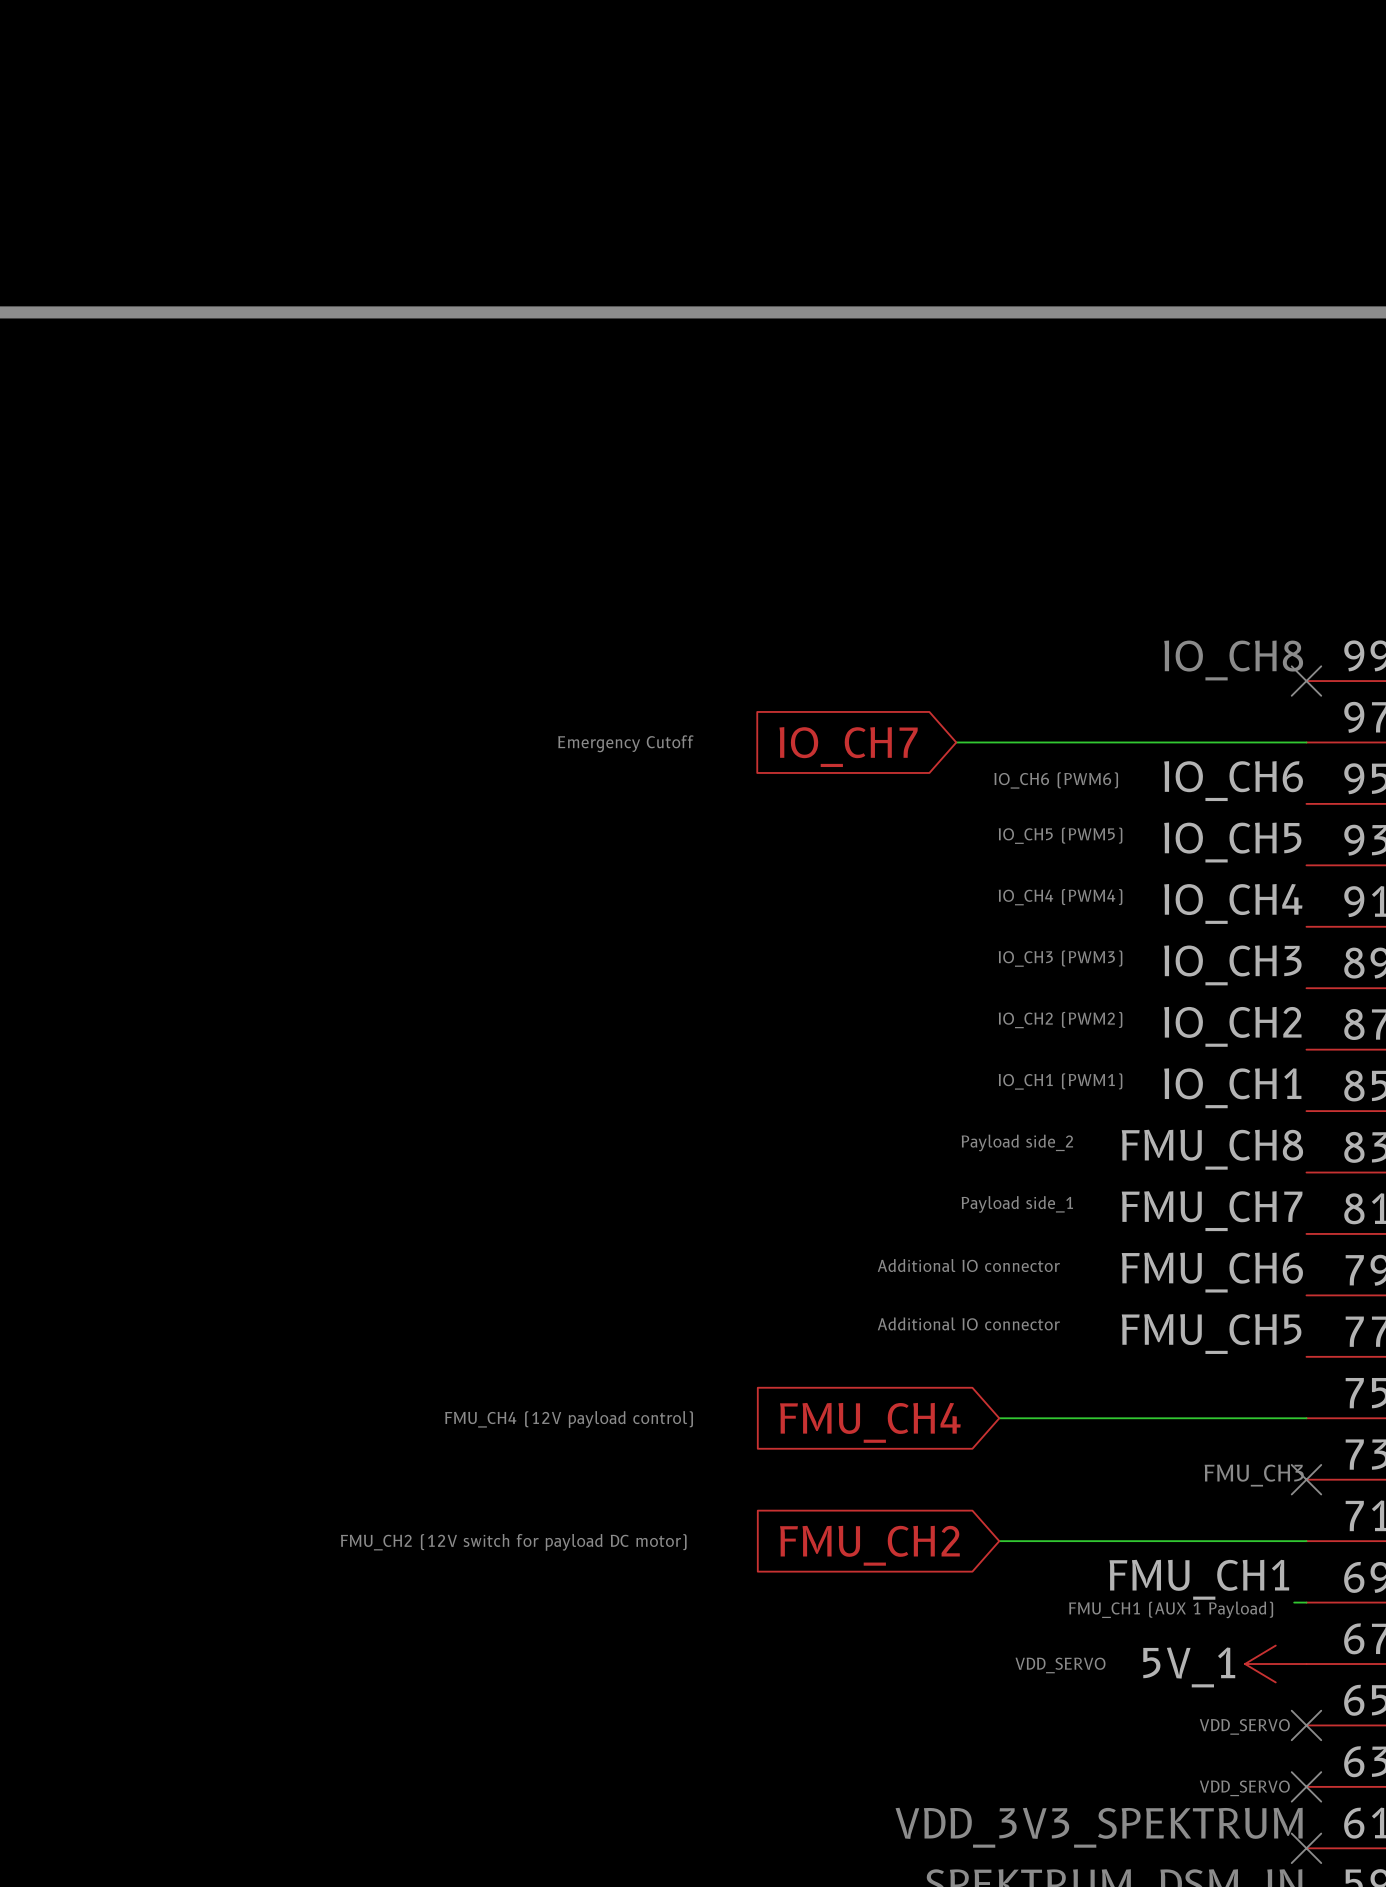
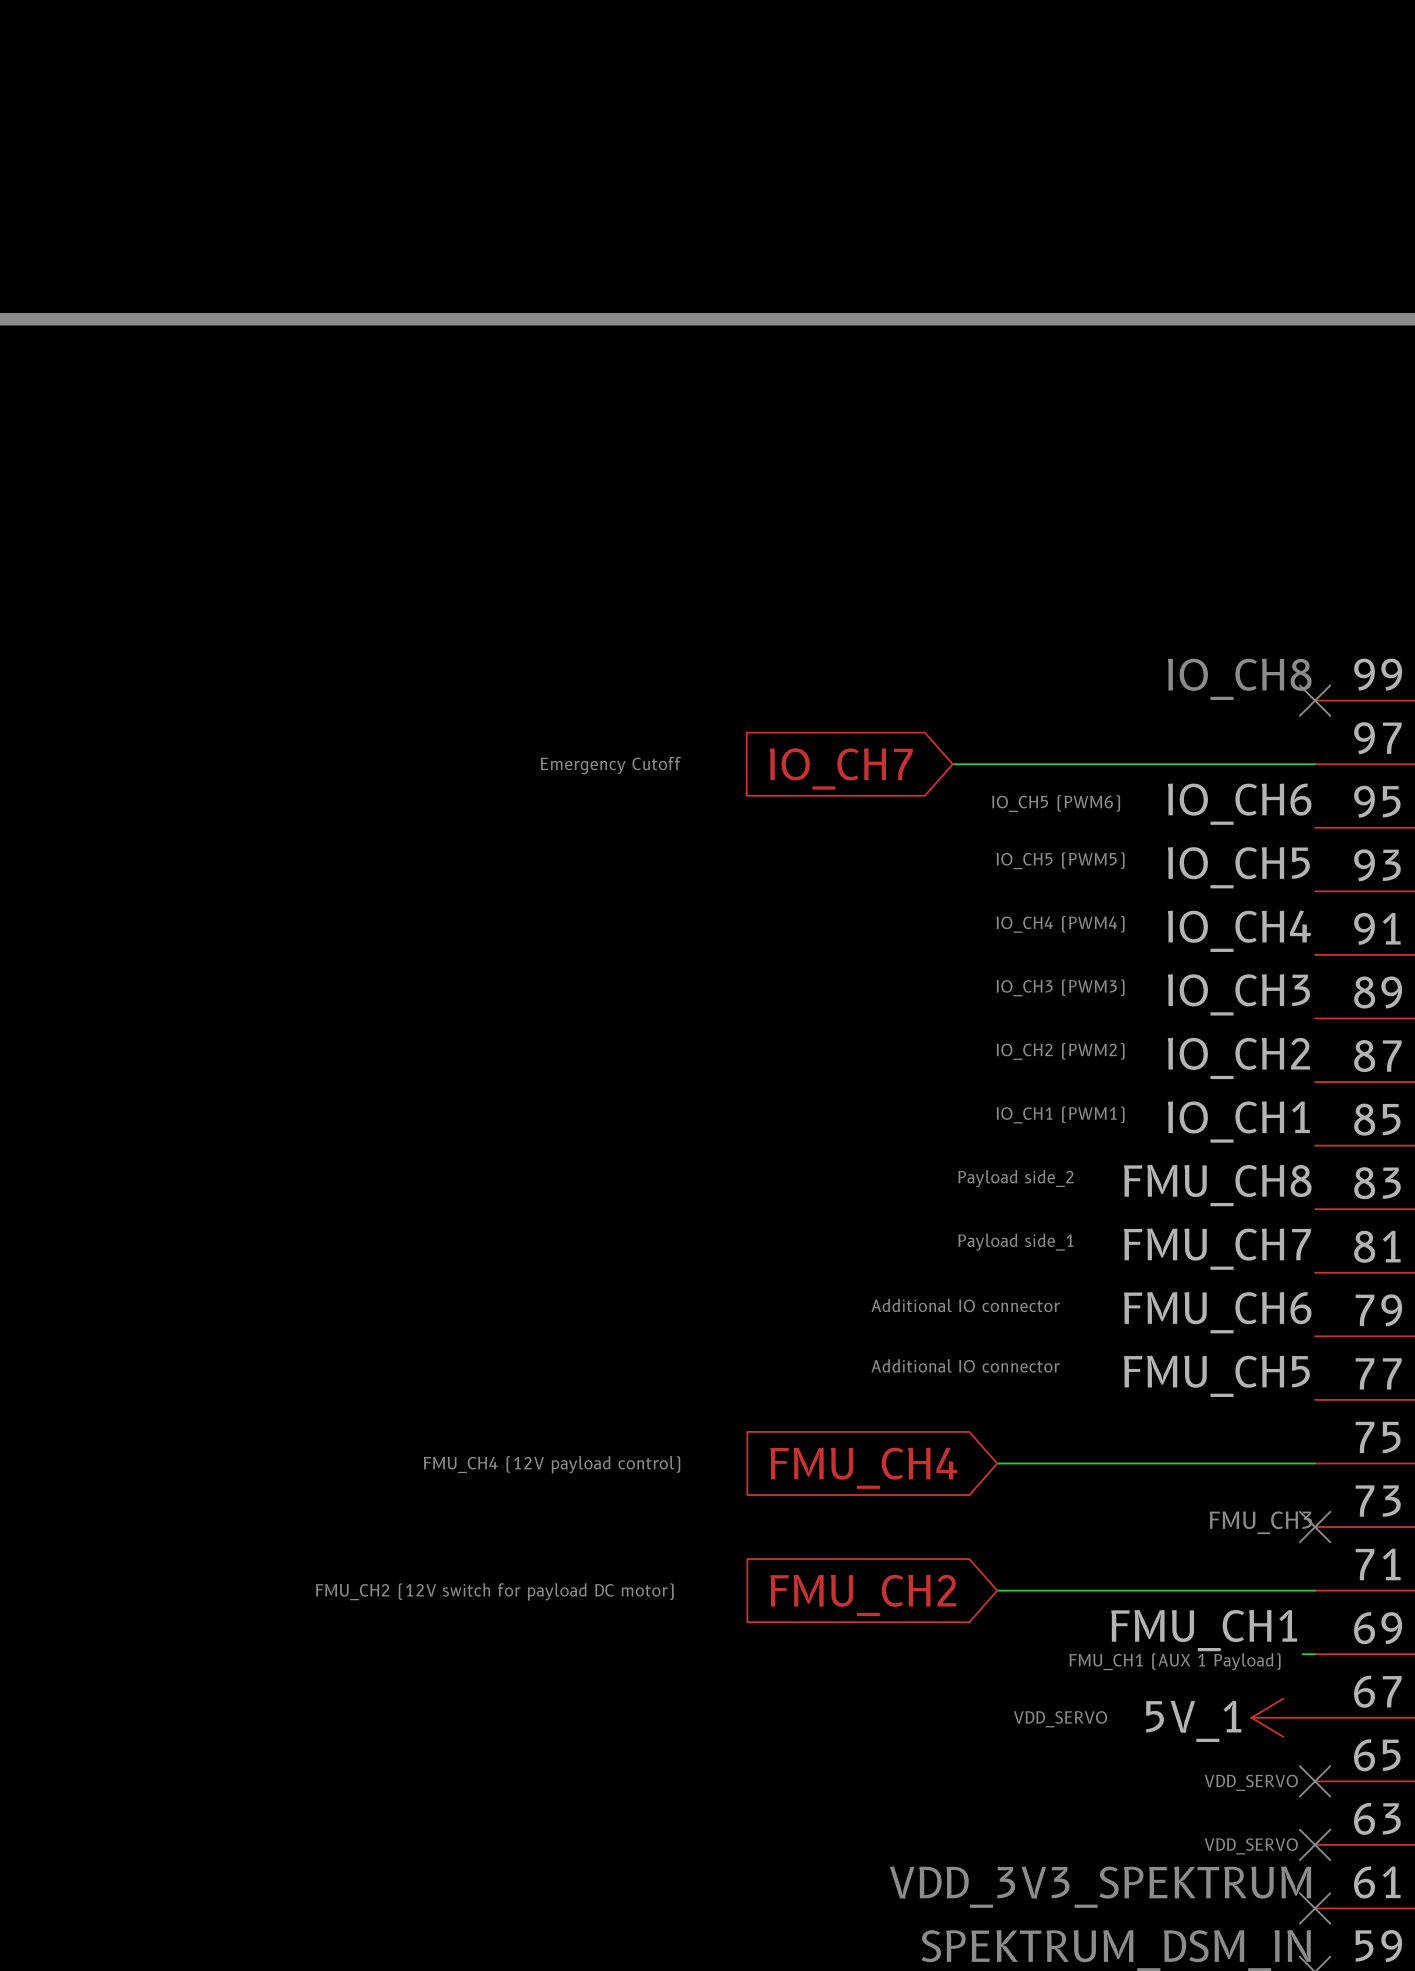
text: IO_CH6 (PWM6) (1056, 780) -> IO_CH5 (PWM6) (1056, 803)

